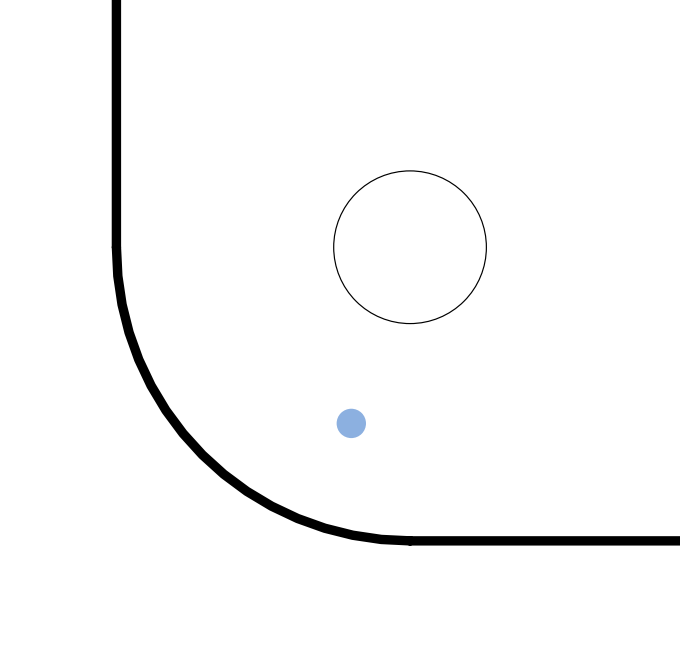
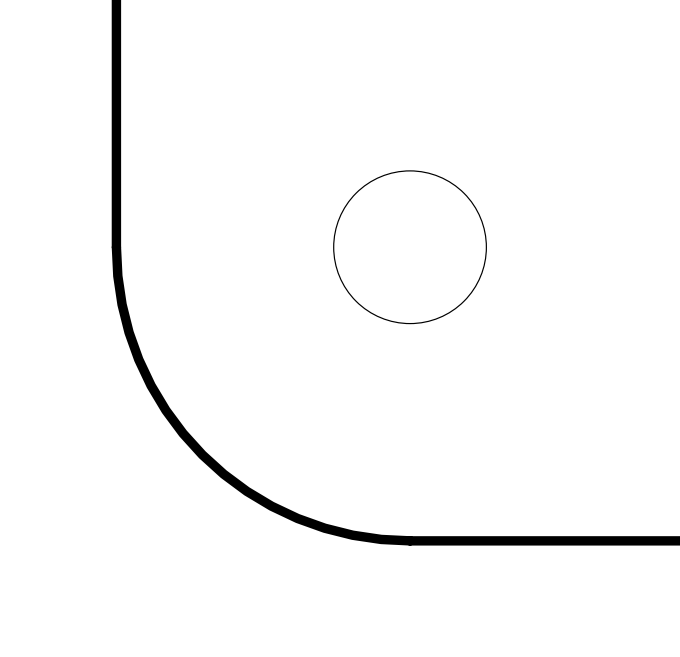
part: (351, 423) -> none

